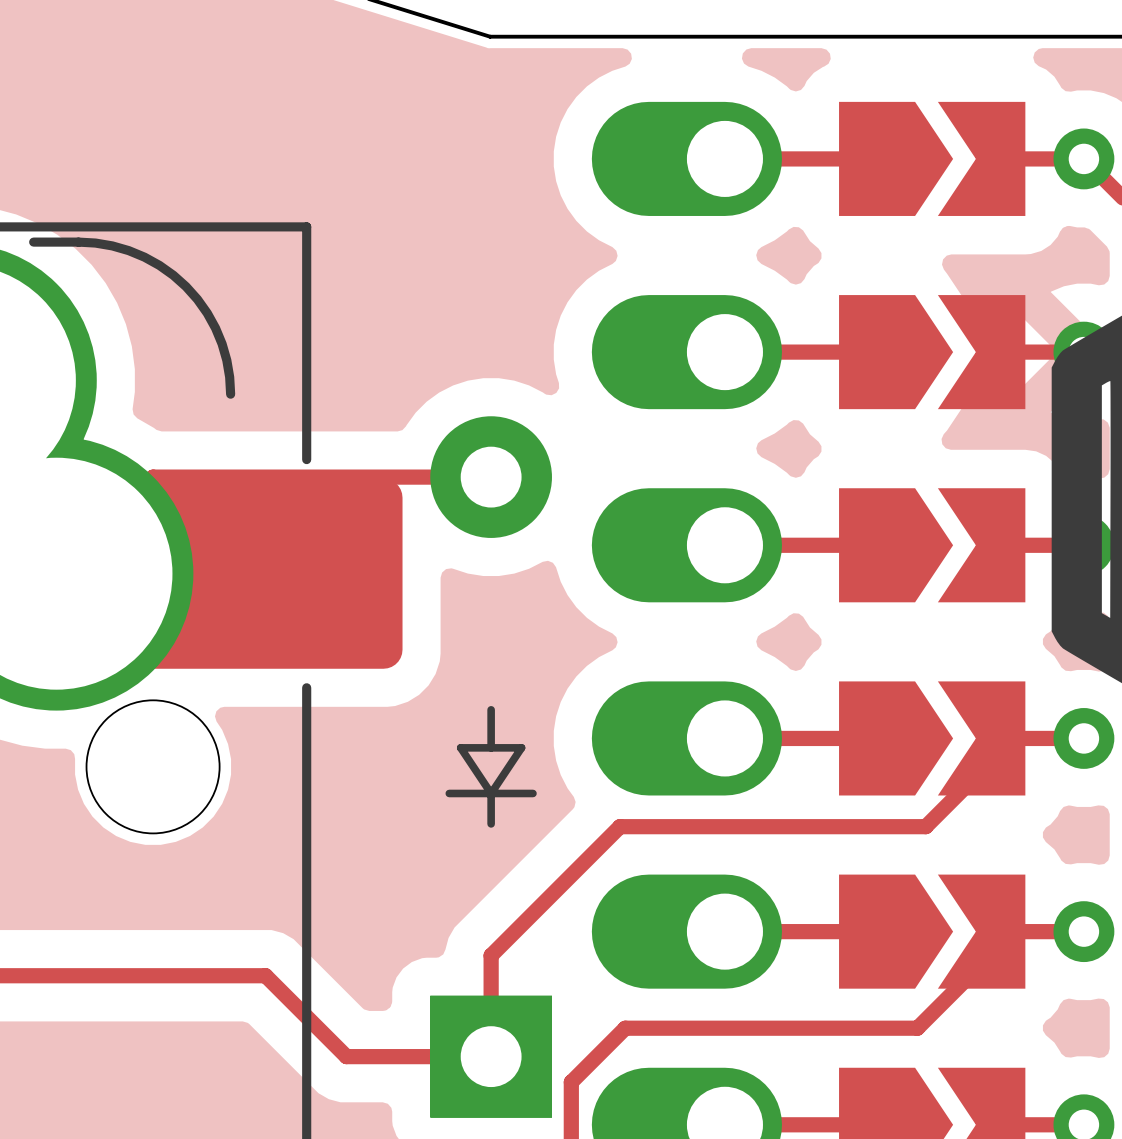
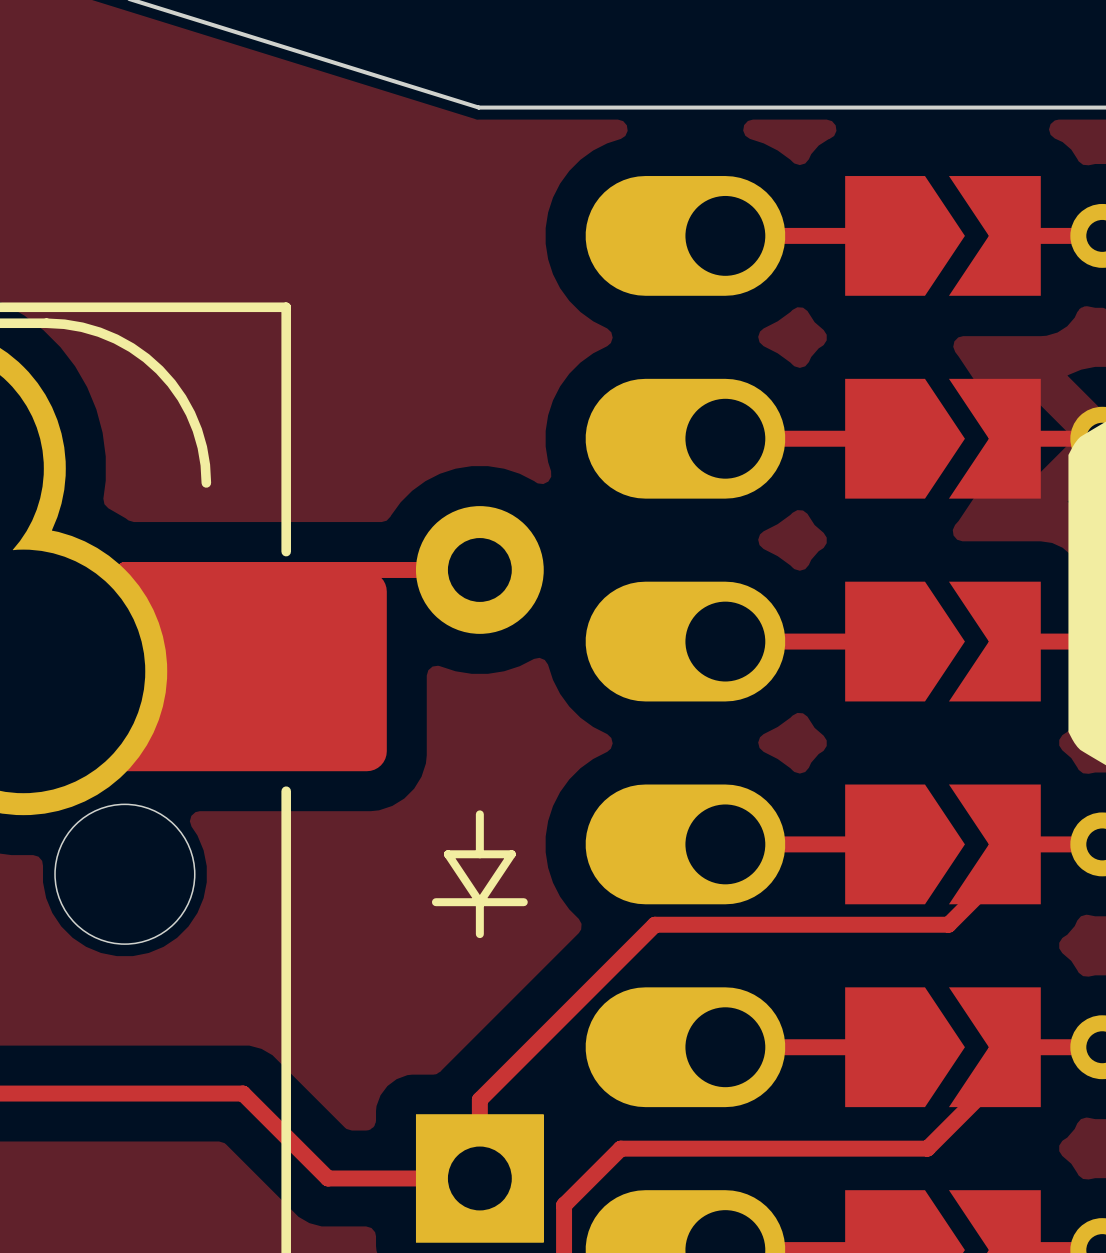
track: (937, 814) (925, 826) (619, 826) (491, 955) (491, 981) -> (948, 924) (654, 924) (479, 1099)

